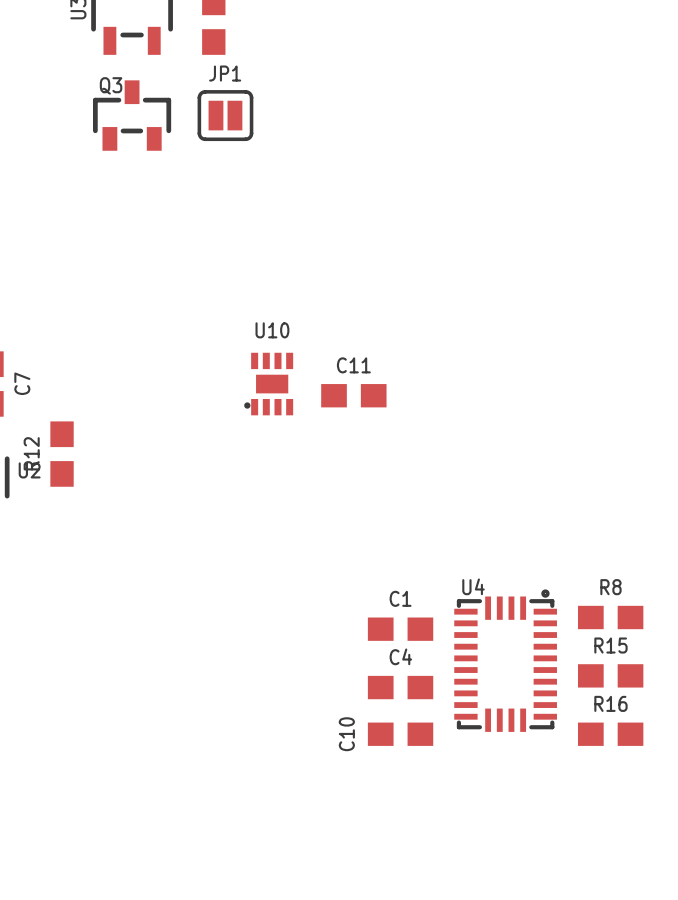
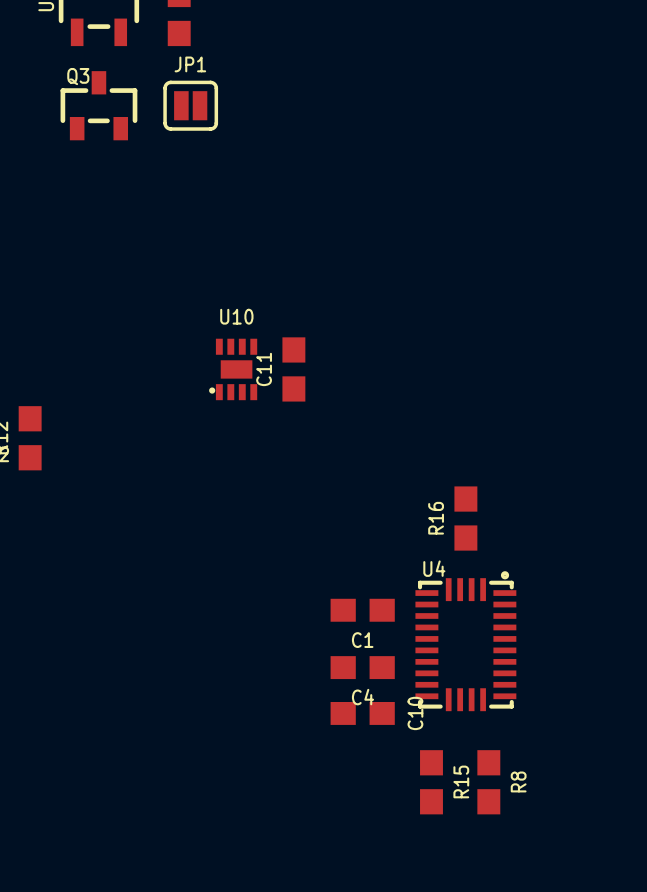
C11 rotation: 0° (353, 395) -> 90° clockwise (293, 369)
C1 name position: C1 (400, 598) -> C1 (362, 640)
R8 rotation: 0° (610, 617) -> 90° clockwise (488, 782)
R8 position: (610, 617) -> (488, 782)
C4 name position: C4 (400, 656) -> C4 (362, 697)
R15 rotation: 0° (610, 675) -> 90° clockwise (431, 782)
R15 position: (610, 675) -> (431, 782)
C10 name position: C10 (346, 734) -> C10 (415, 713)
R16 rotation: 0° (610, 734) -> 90° clockwise (465, 518)
R16 position: (610, 734) -> (465, 518)

